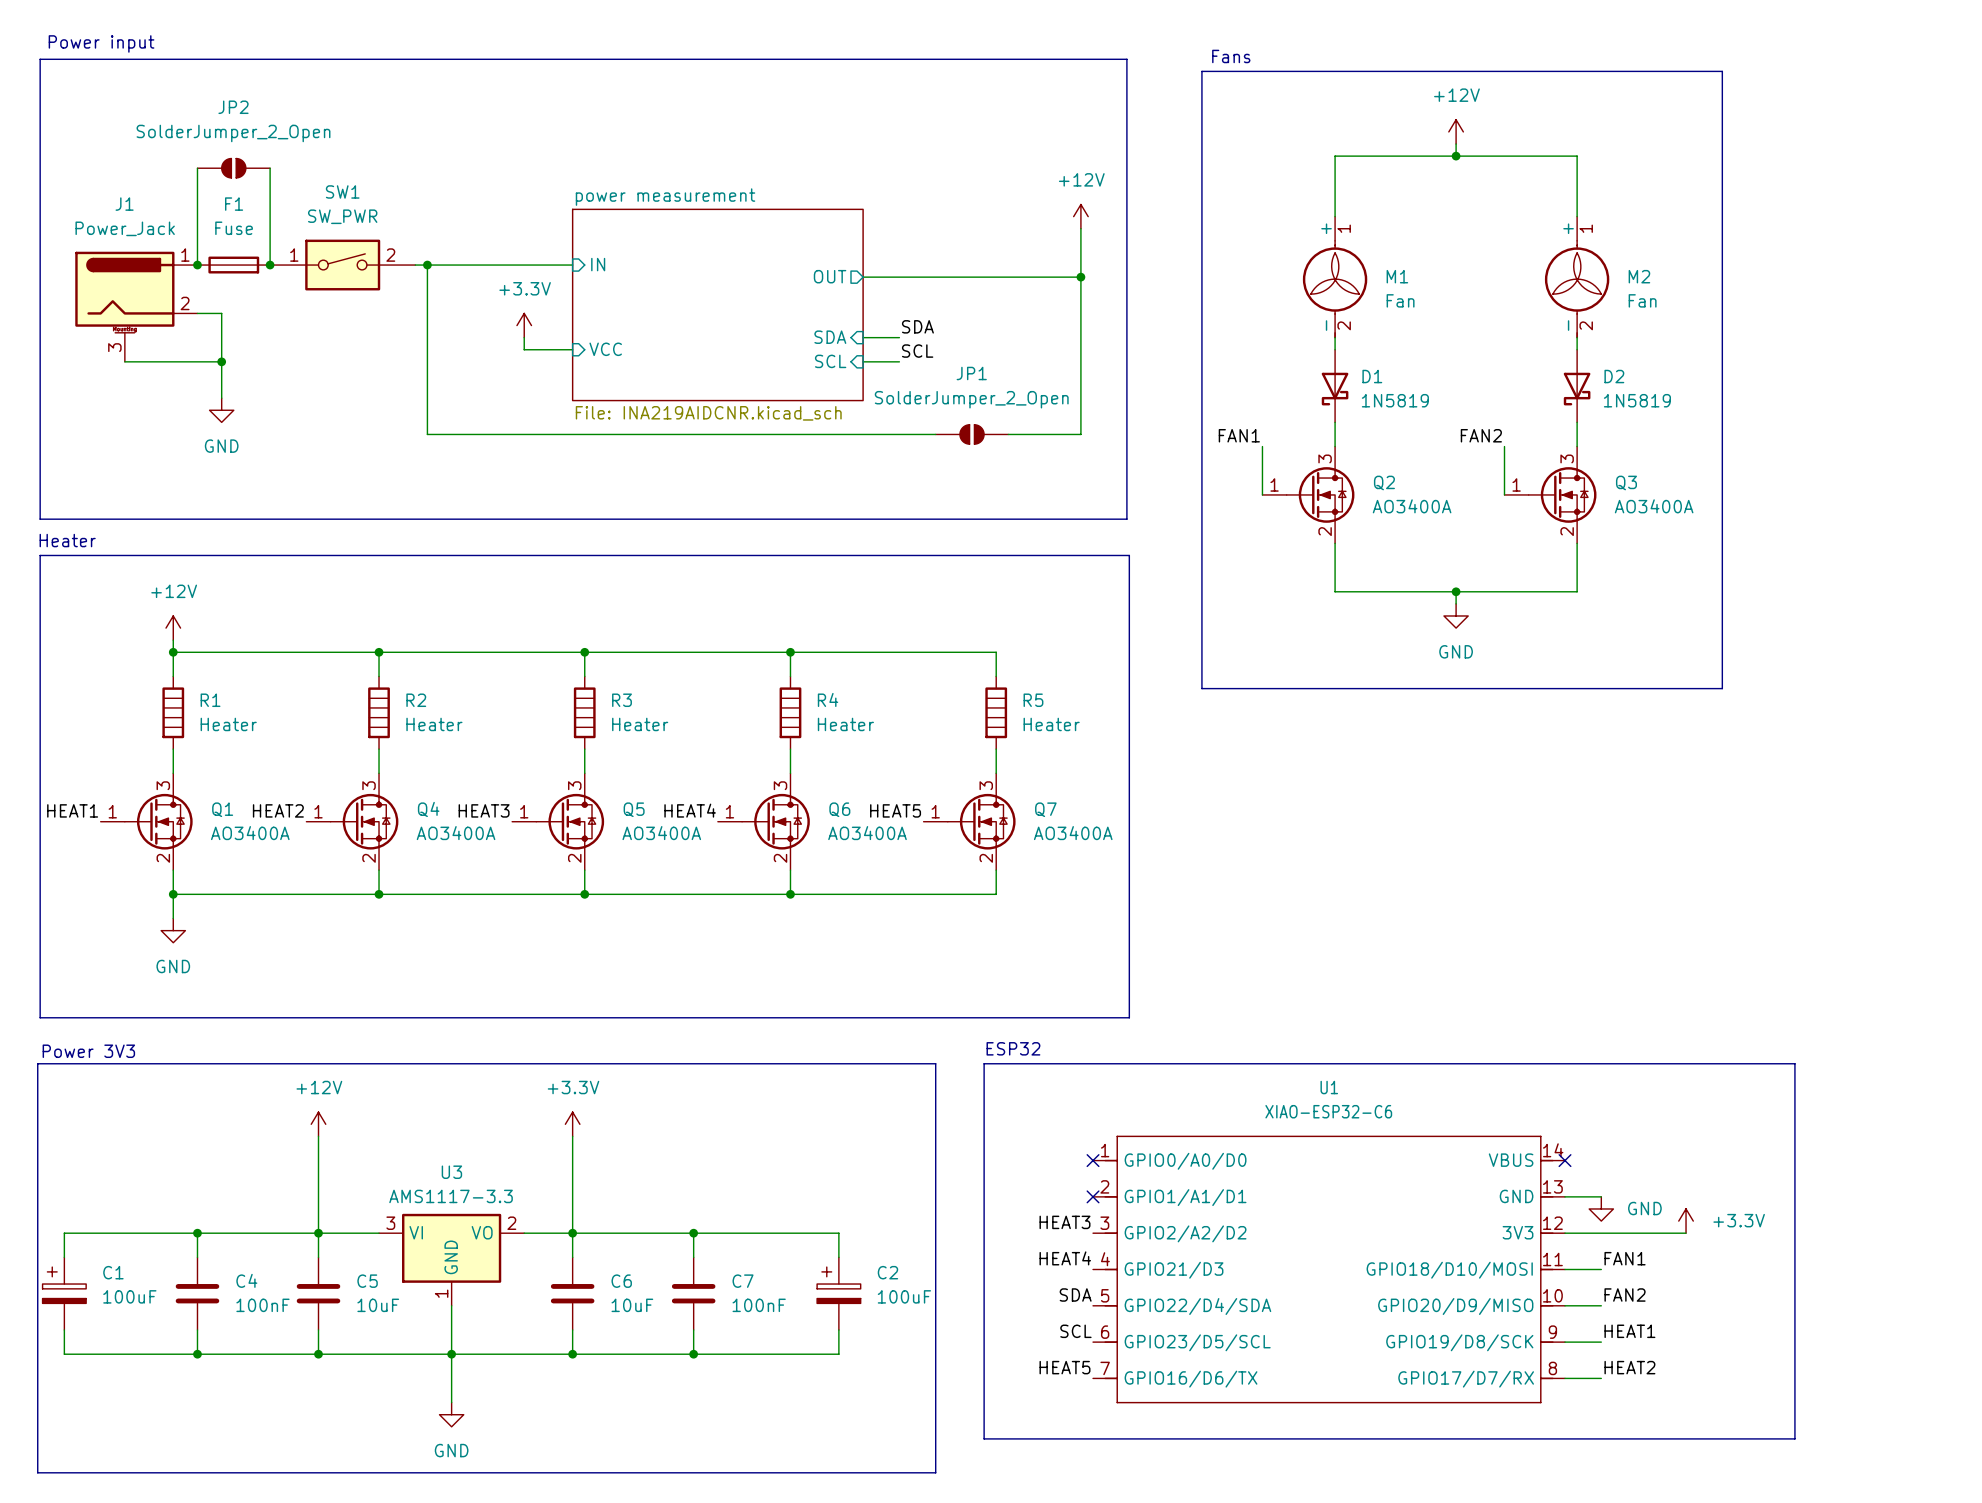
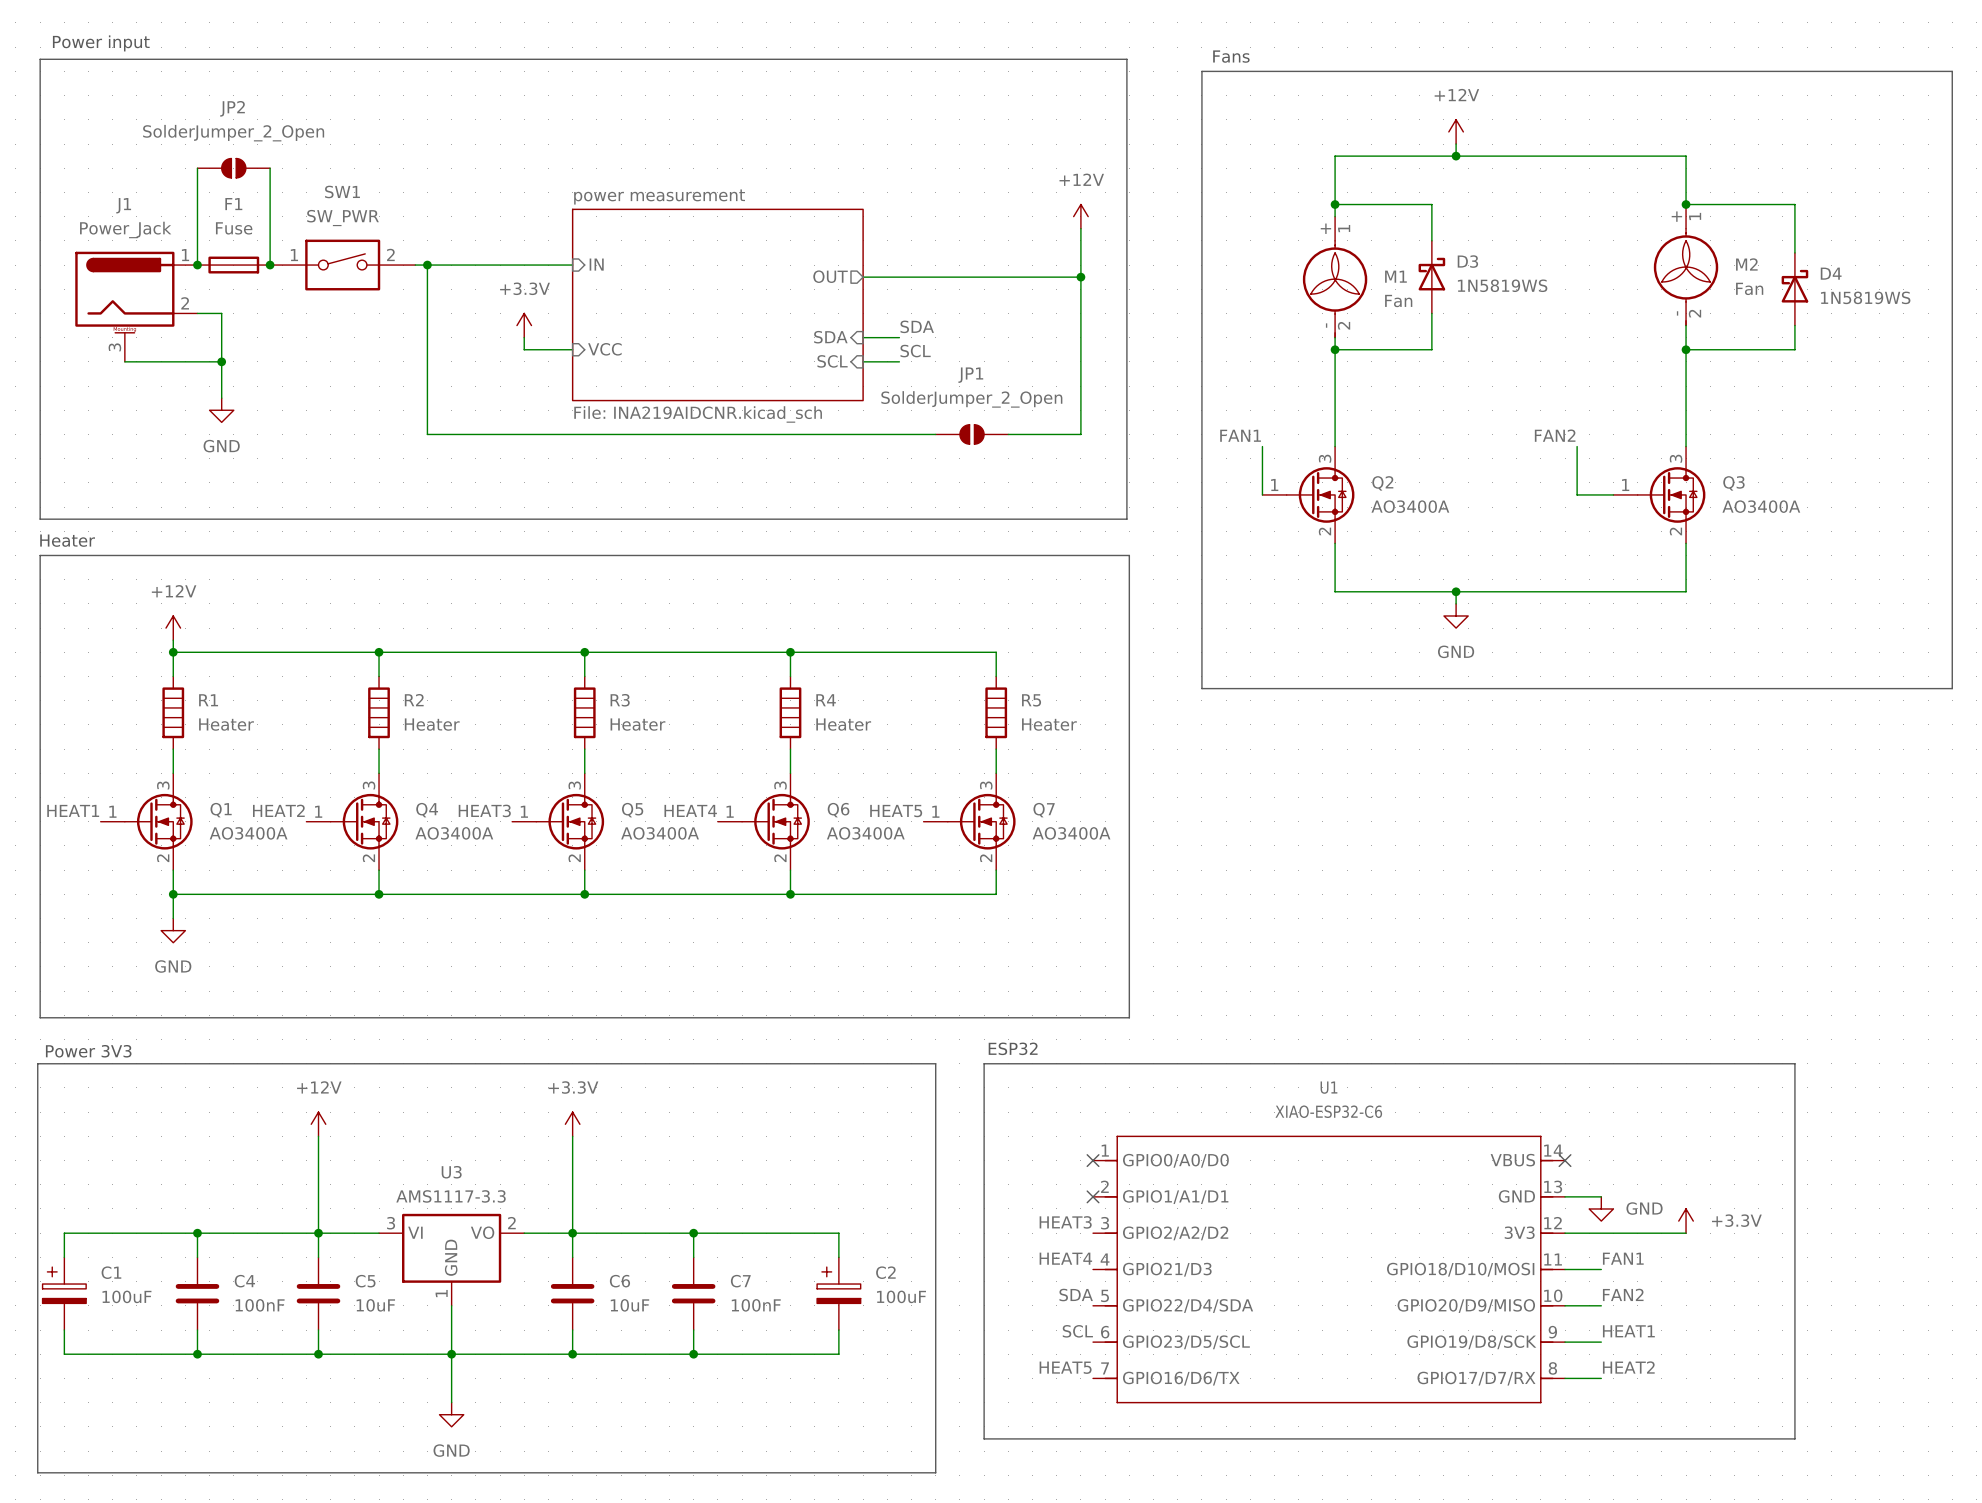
line: (1722, 71) (1722, 688) -> (1722, 71) (1952, 71) (1952, 688) (1722, 688)
wire: (1577, 156) (1577, 216) -> (1577, 156) (1686, 156) (1686, 204) (1794, 204) (1794, 252)
wire: none -> (1335, 204) (1431, 204) (1431, 240)
junction: none -> (1335, 204)
junction: none -> (1686, 204)
D3: none -> 1N5819WS (1431, 277)
M2 position: (1577, 277) -> (1686, 265)
D4: none -> 1N5819WS (1794, 289)
wire: none -> (1431, 313) (1431, 349) (1335, 349) (1335, 422)
wire: none -> (1686, 325) (1686, 446)
wire: none -> (1794, 325) (1794, 349) (1686, 349)
wire: (1577, 337) (1577, 349) -> none
junction: none -> (1335, 349)
junction: none -> (1686, 349)
D1: 1N5819 (1335, 386) -> none
D2: 1N5819 (1577, 386) -> none
wire: (1577, 422) (1577, 446) -> (1613, 494) (1577, 494) (1577, 446)
label position: FAN2 (1481, 435) -> FAN2 (1555, 435)
wire: (1504, 446) (1504, 494) -> none
Q3 position: (1550, 494) -> (1659, 494)
wire: (1577, 543) (1577, 591) -> (1686, 543) (1686, 591) (1577, 591)

